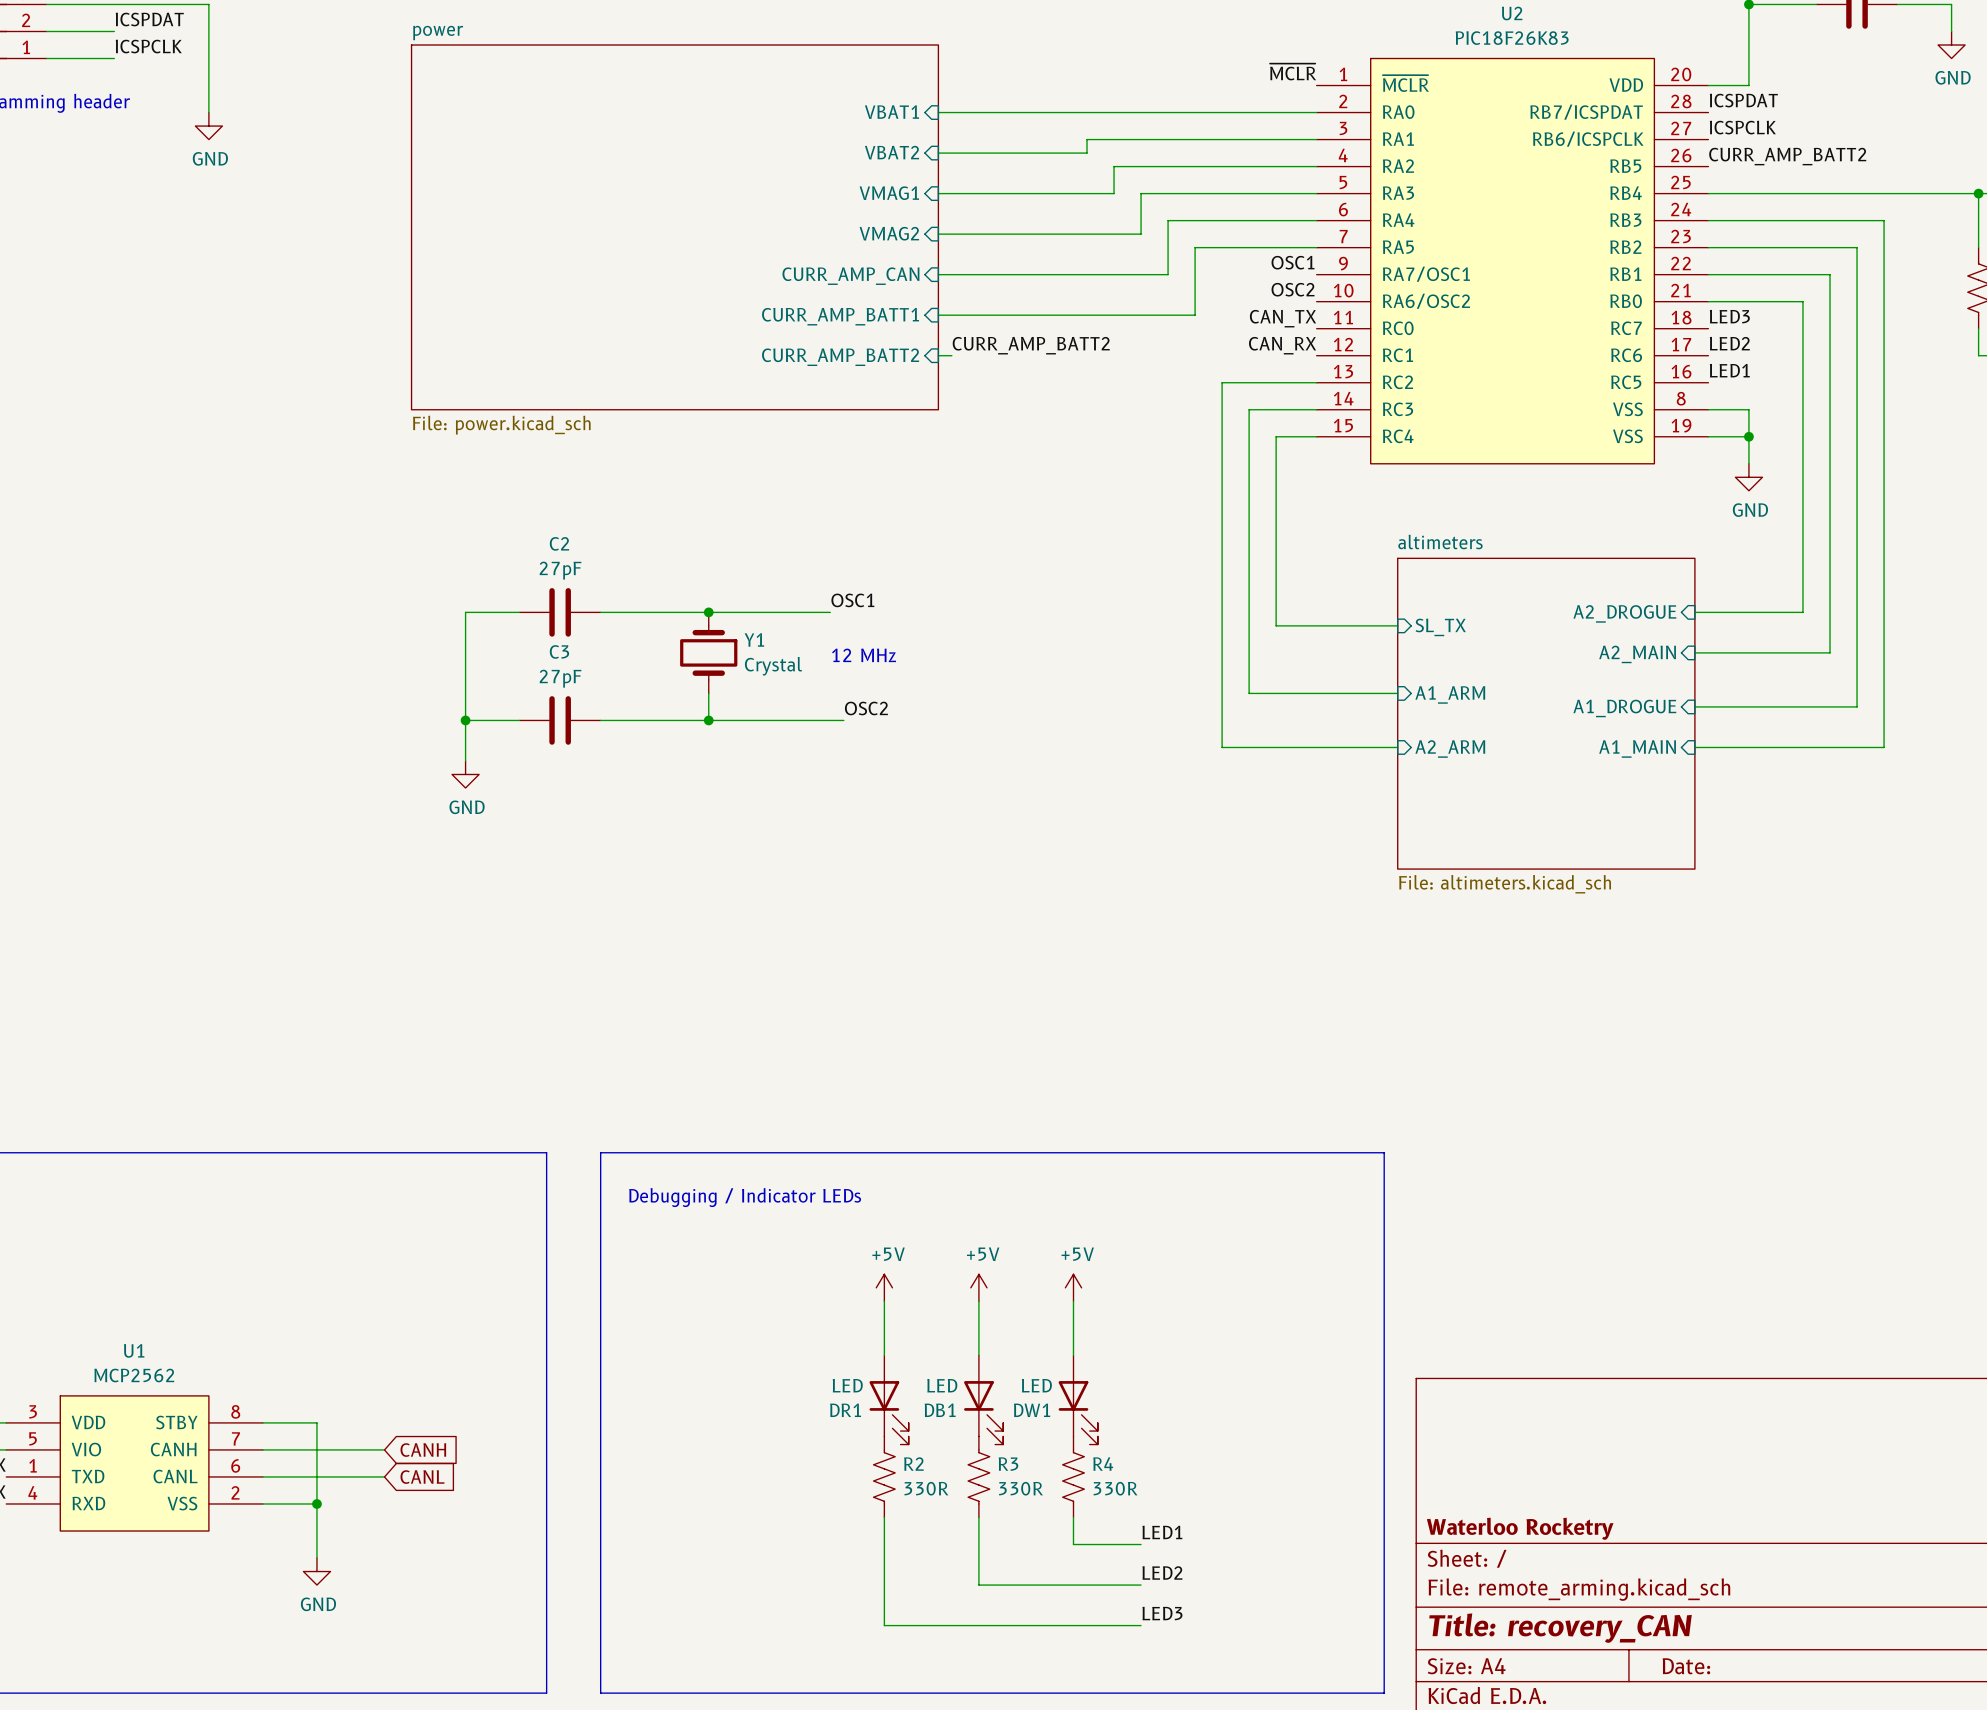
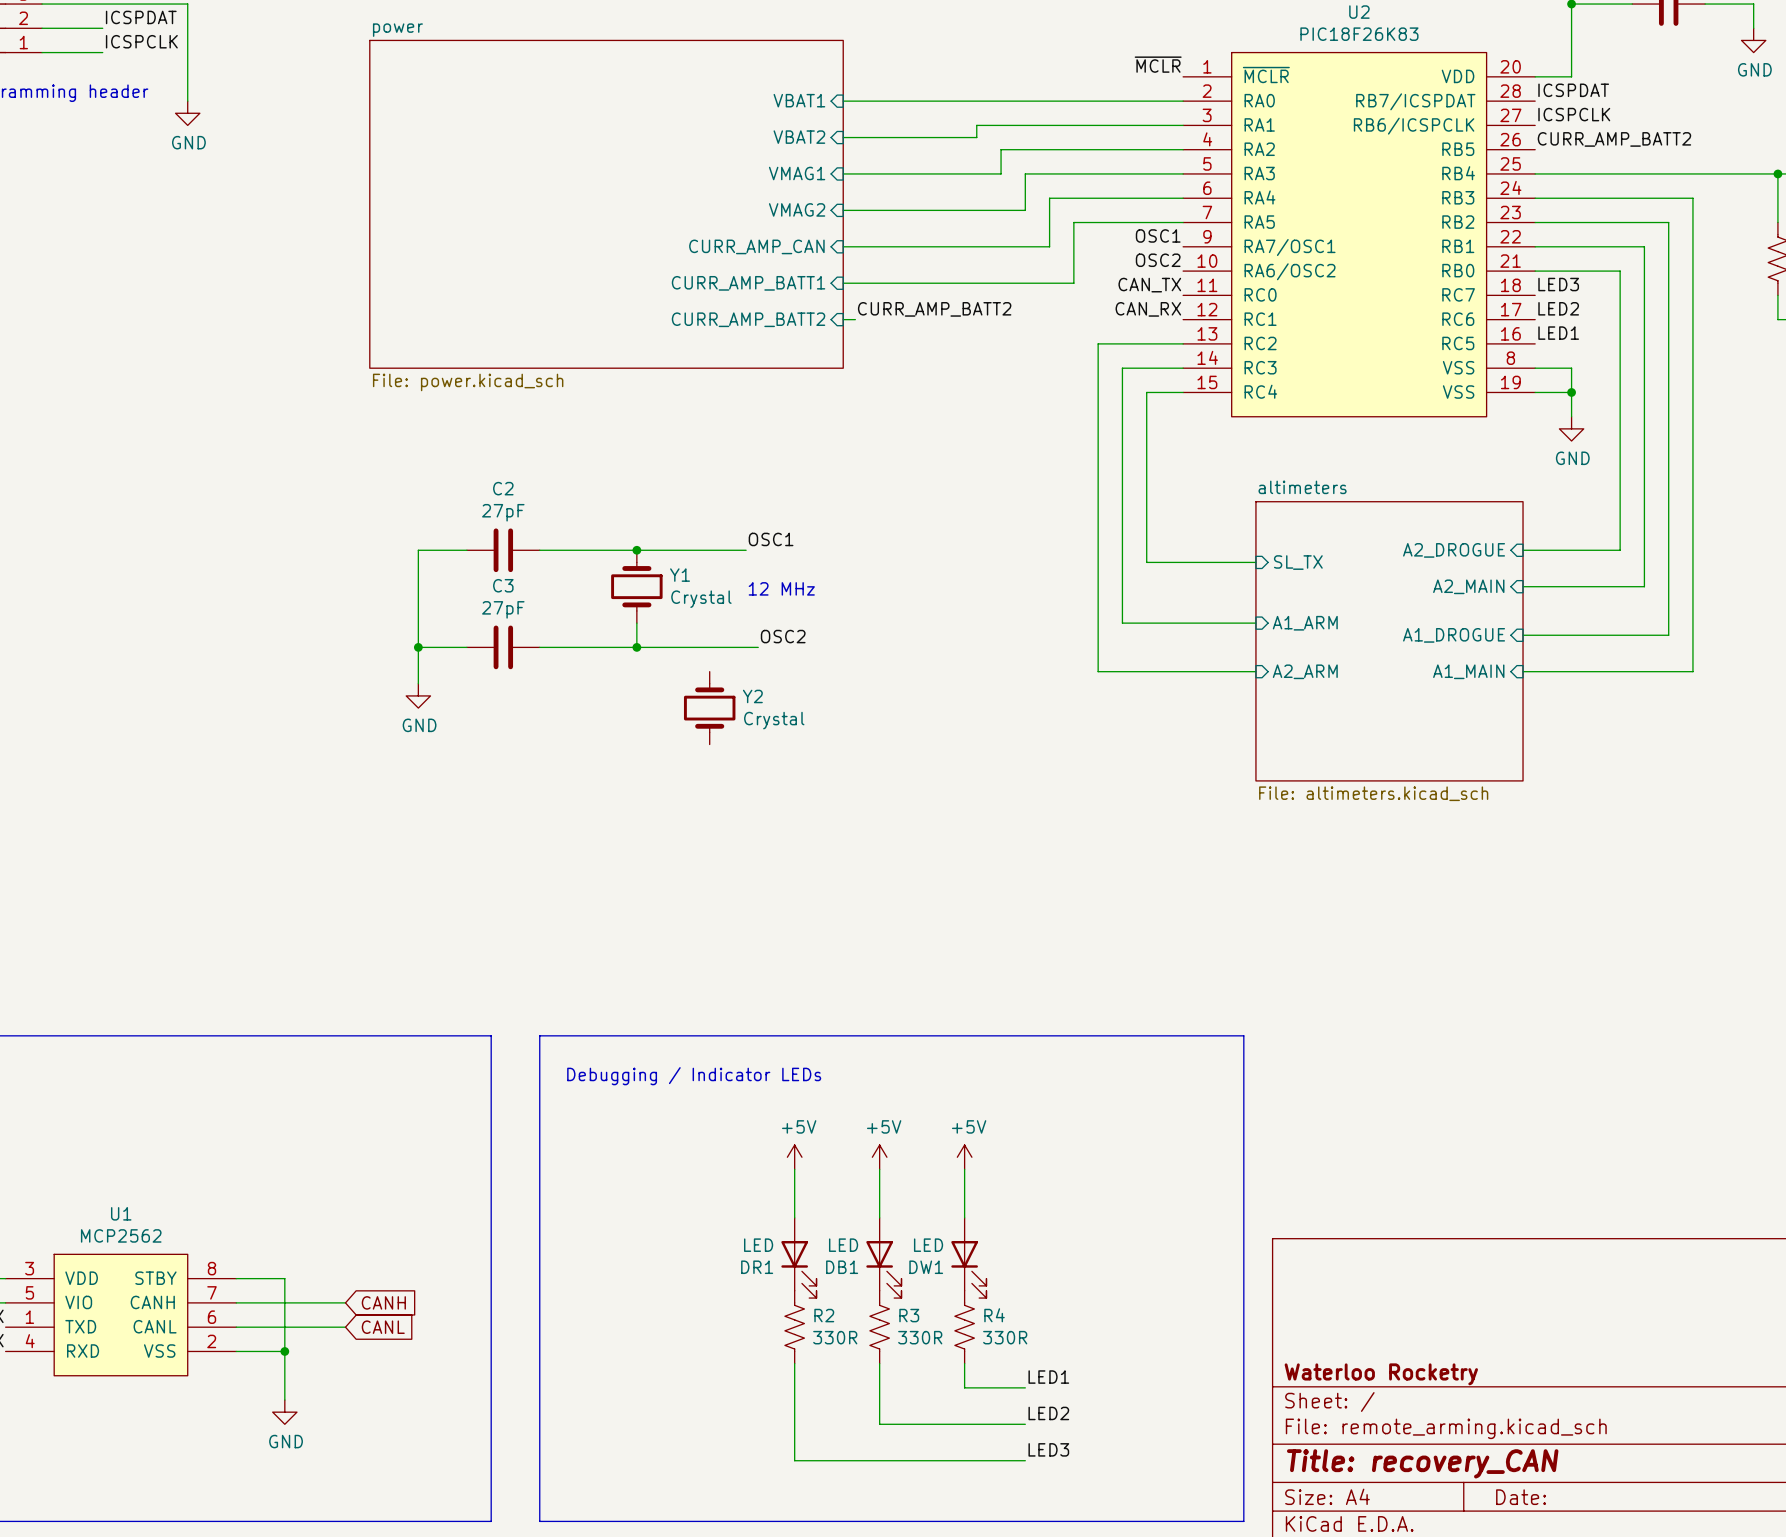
Y2: none -> Crystal (709, 708)

